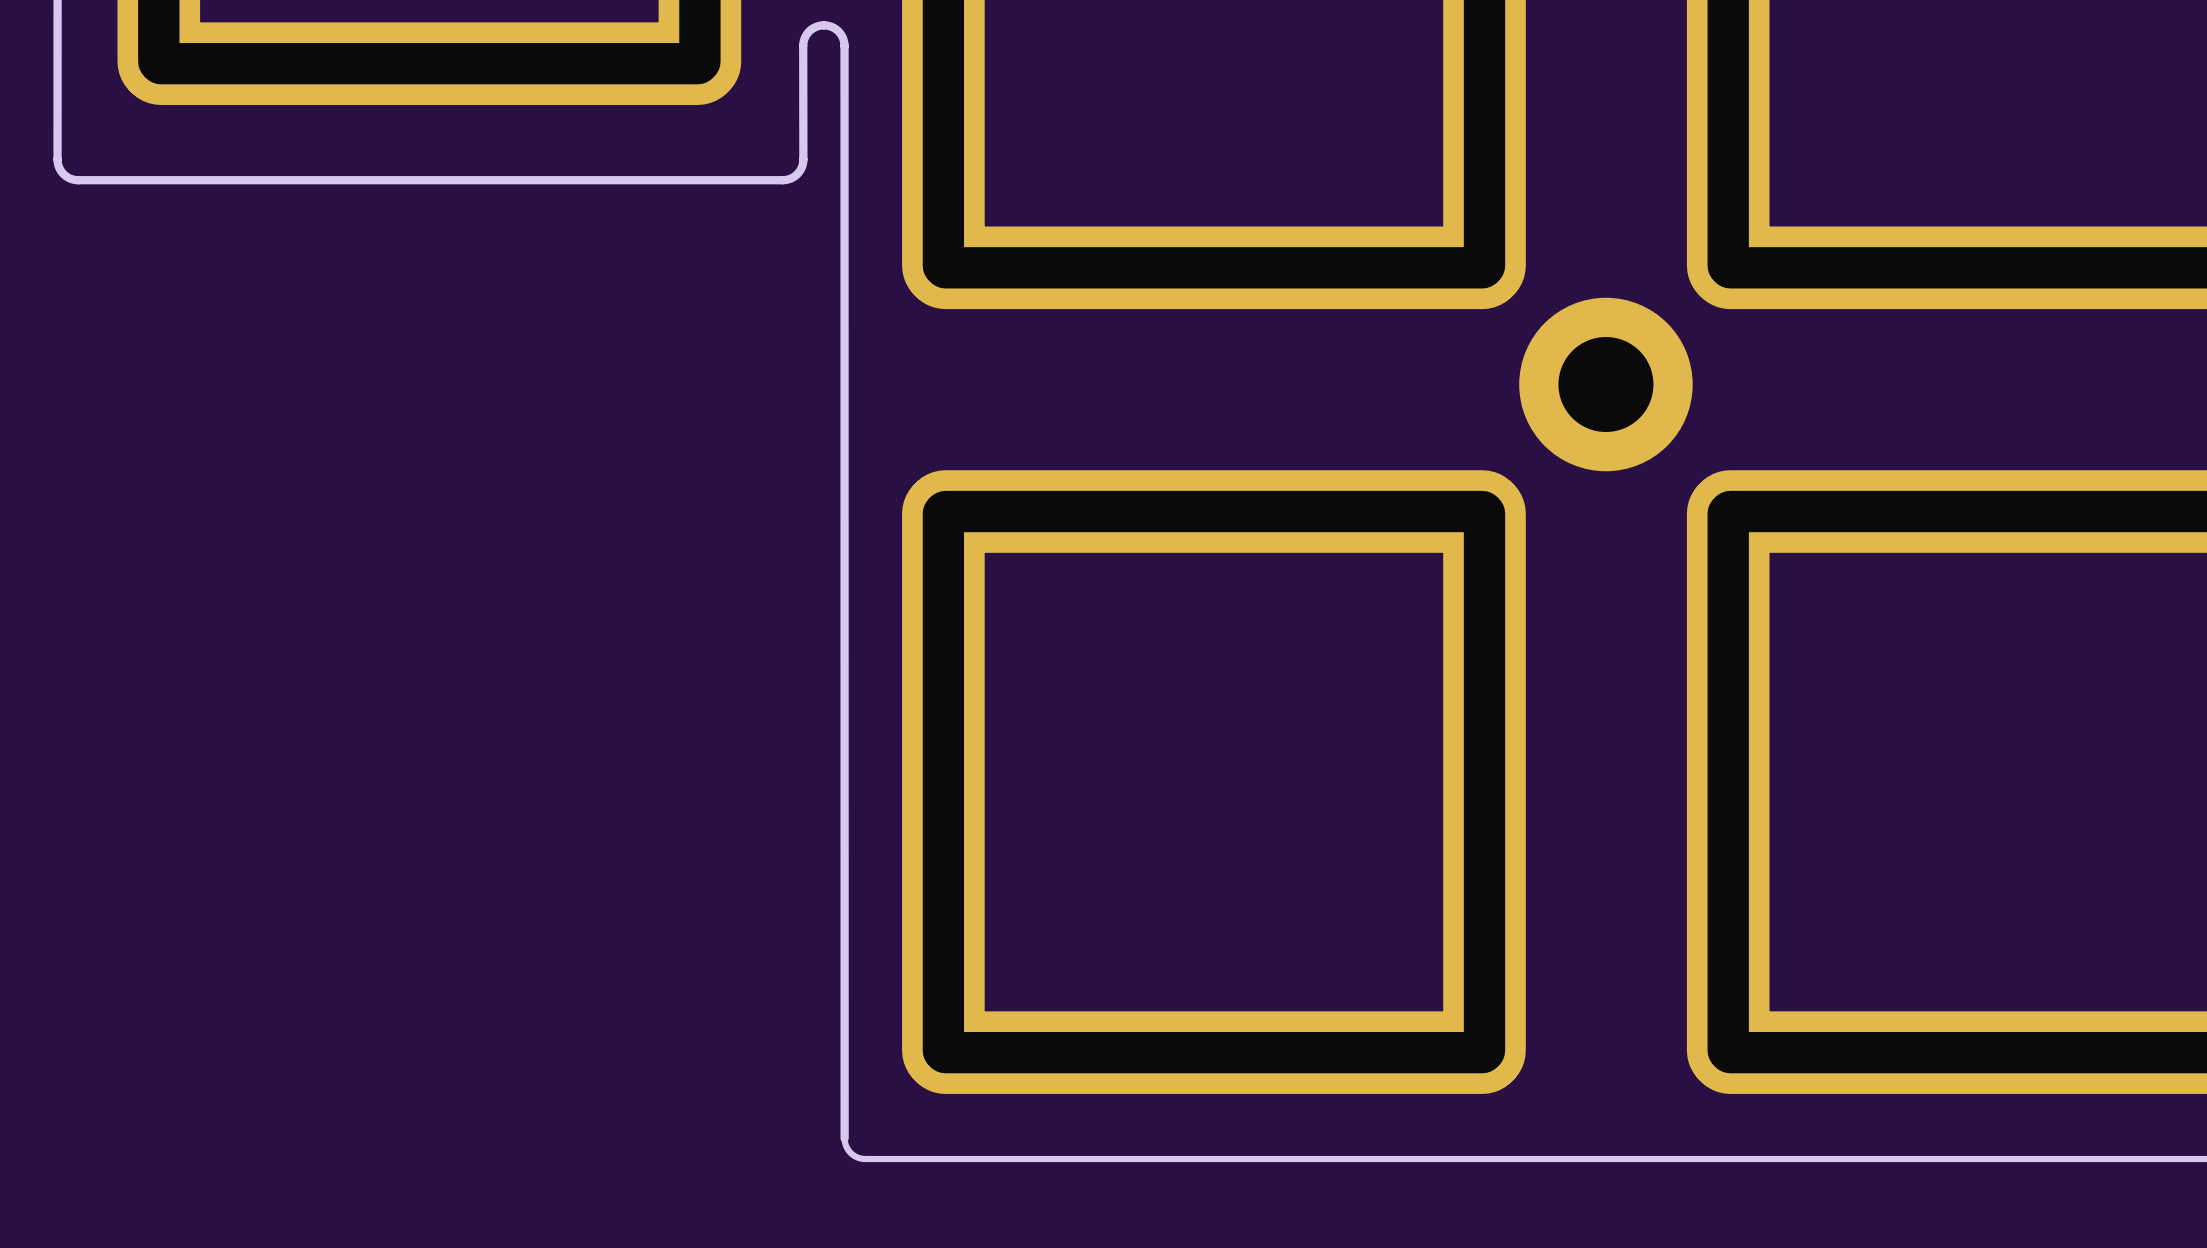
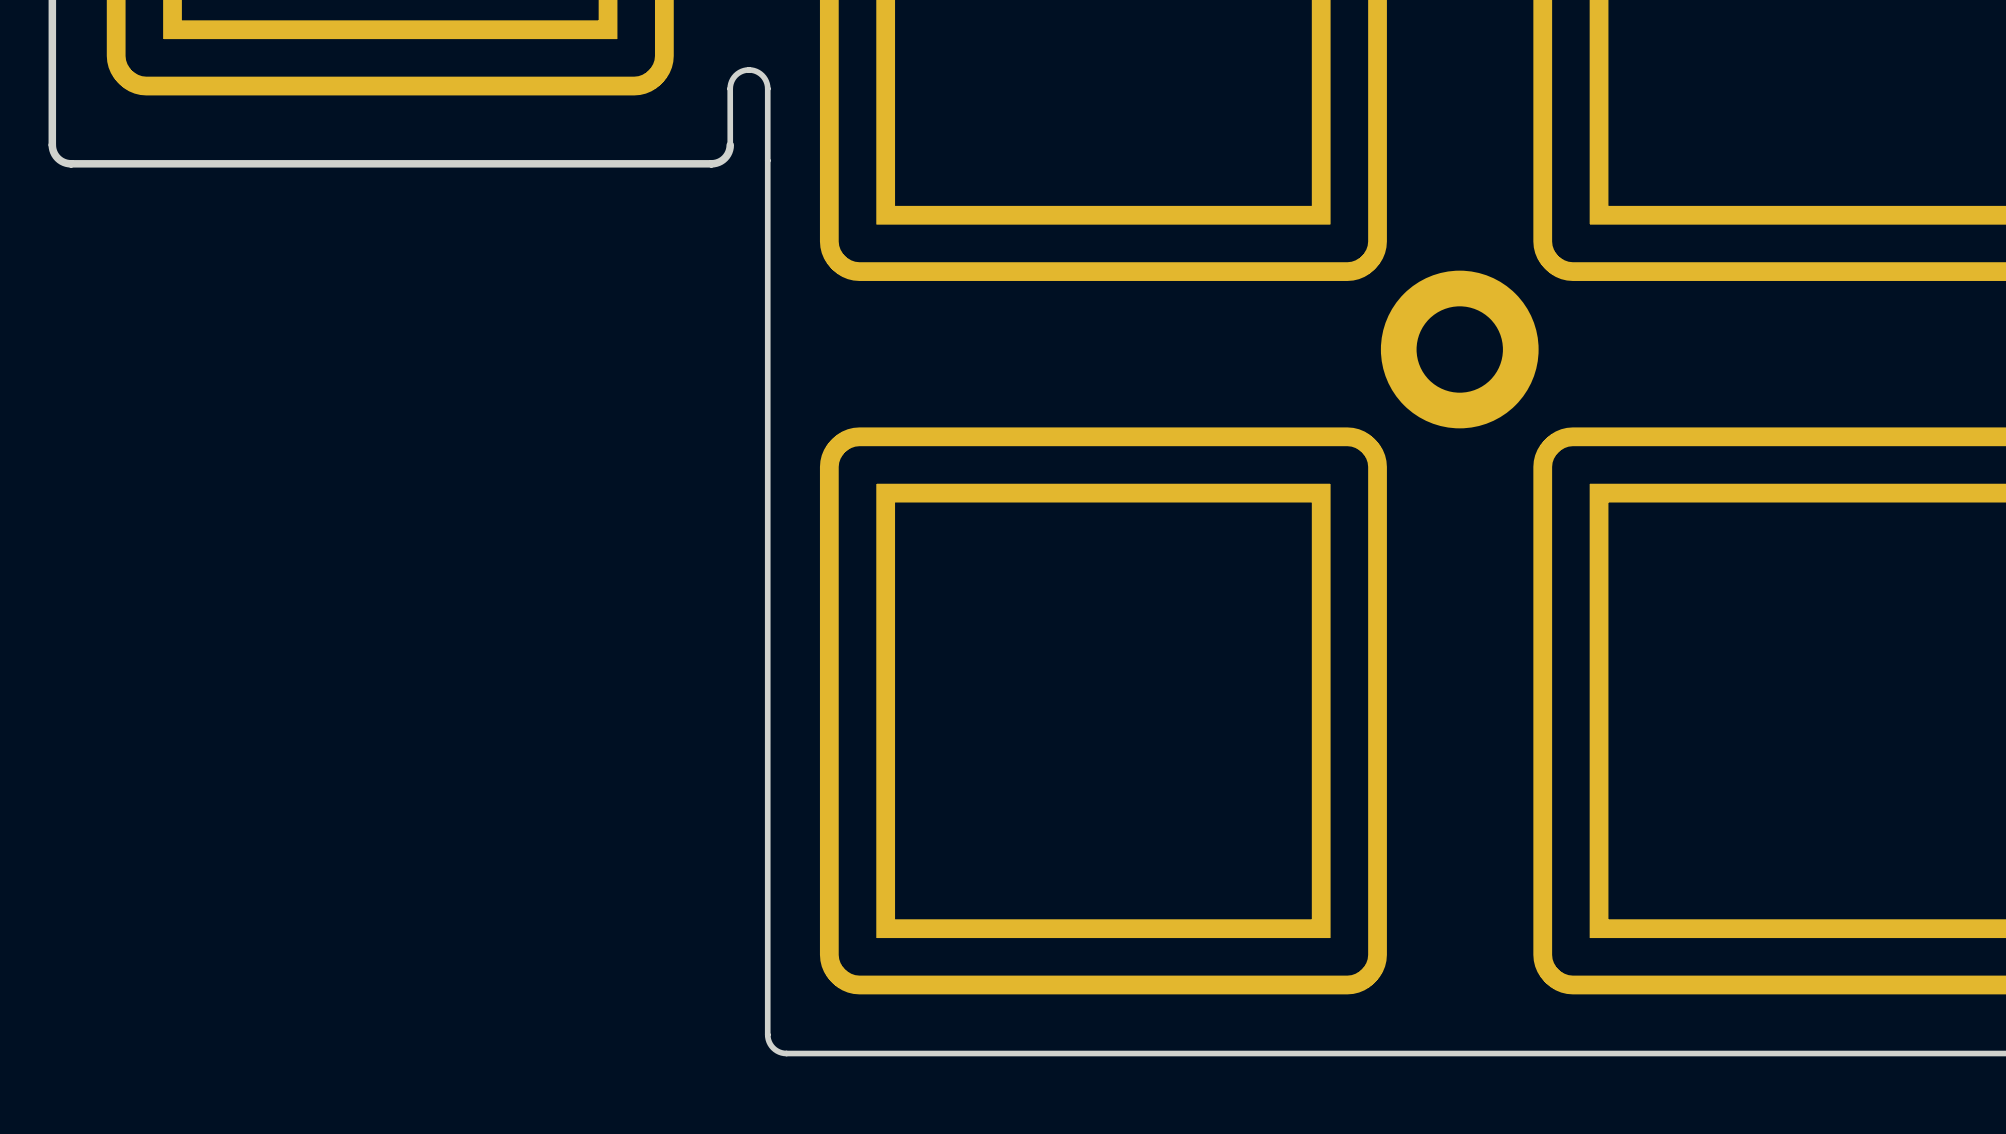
board edge: (803, 159) (803, 43) (805, 35) (811, 29) (818, 26) (826, 25) (838, 31) (842, 38) (844, 45) (844, 1138) -> (730, 145) (730, 83) (739, 72) (753, 70) (763, 77) (767, 88) (767, 1034)

